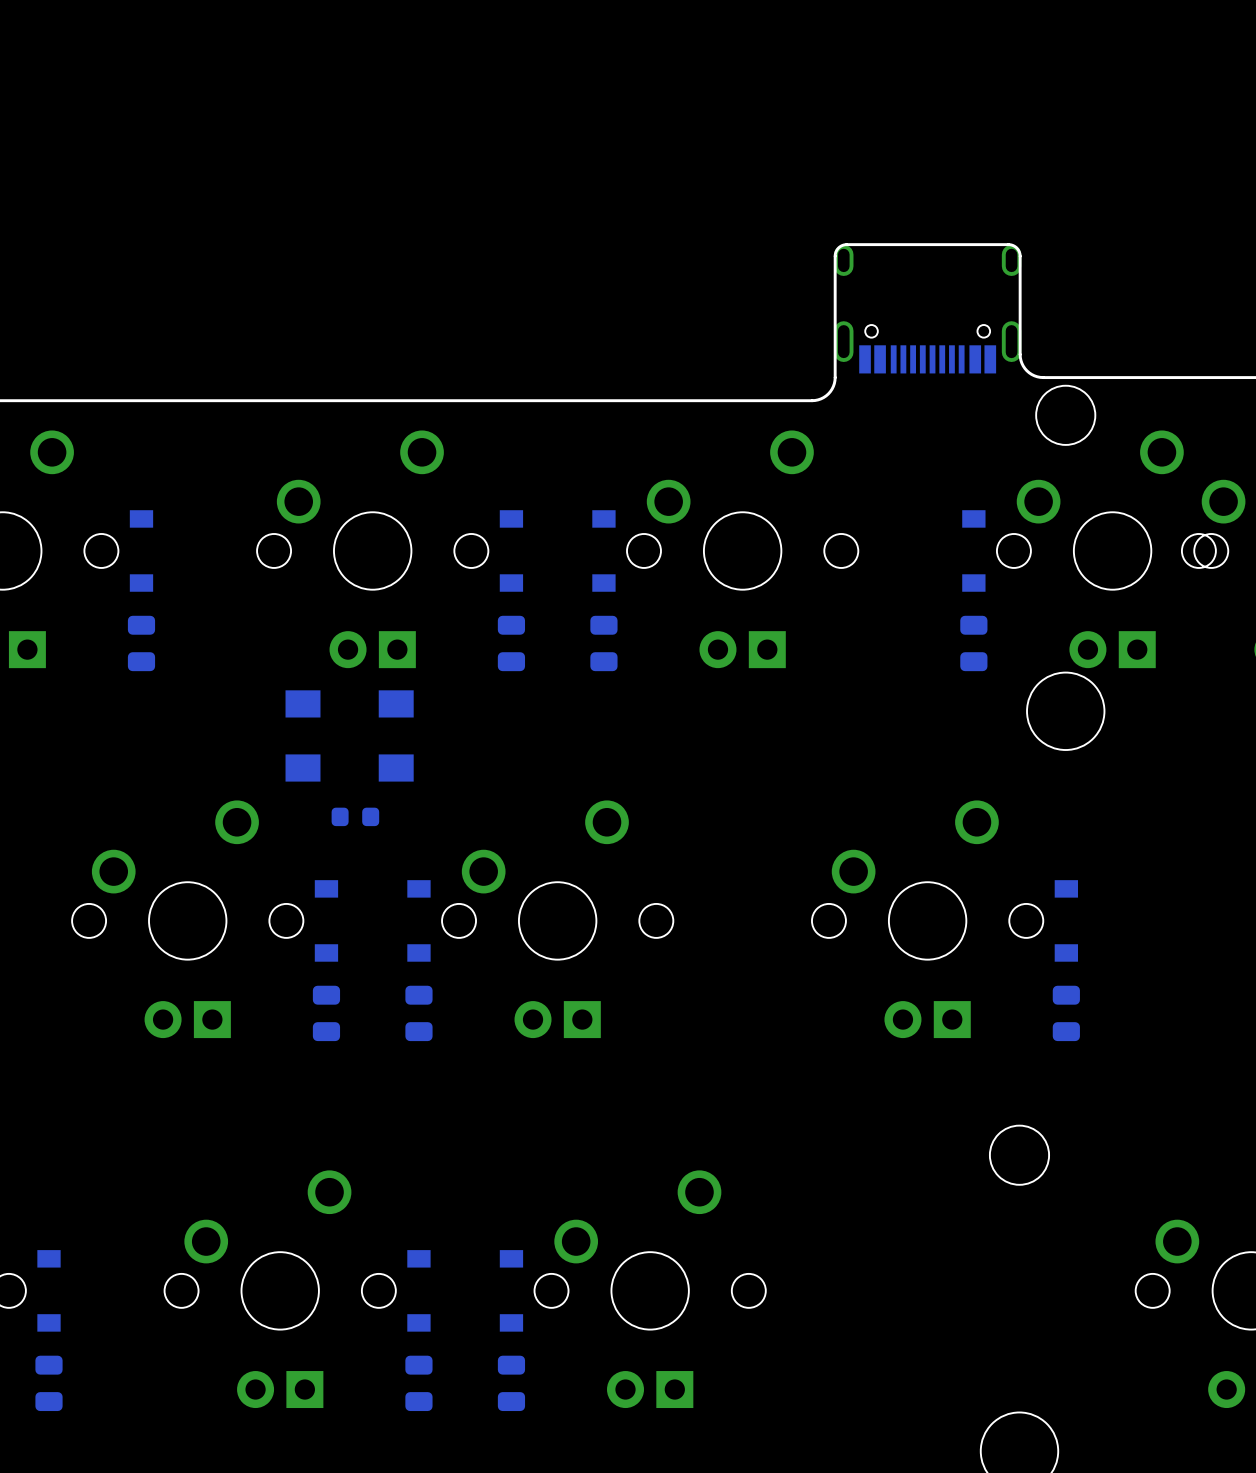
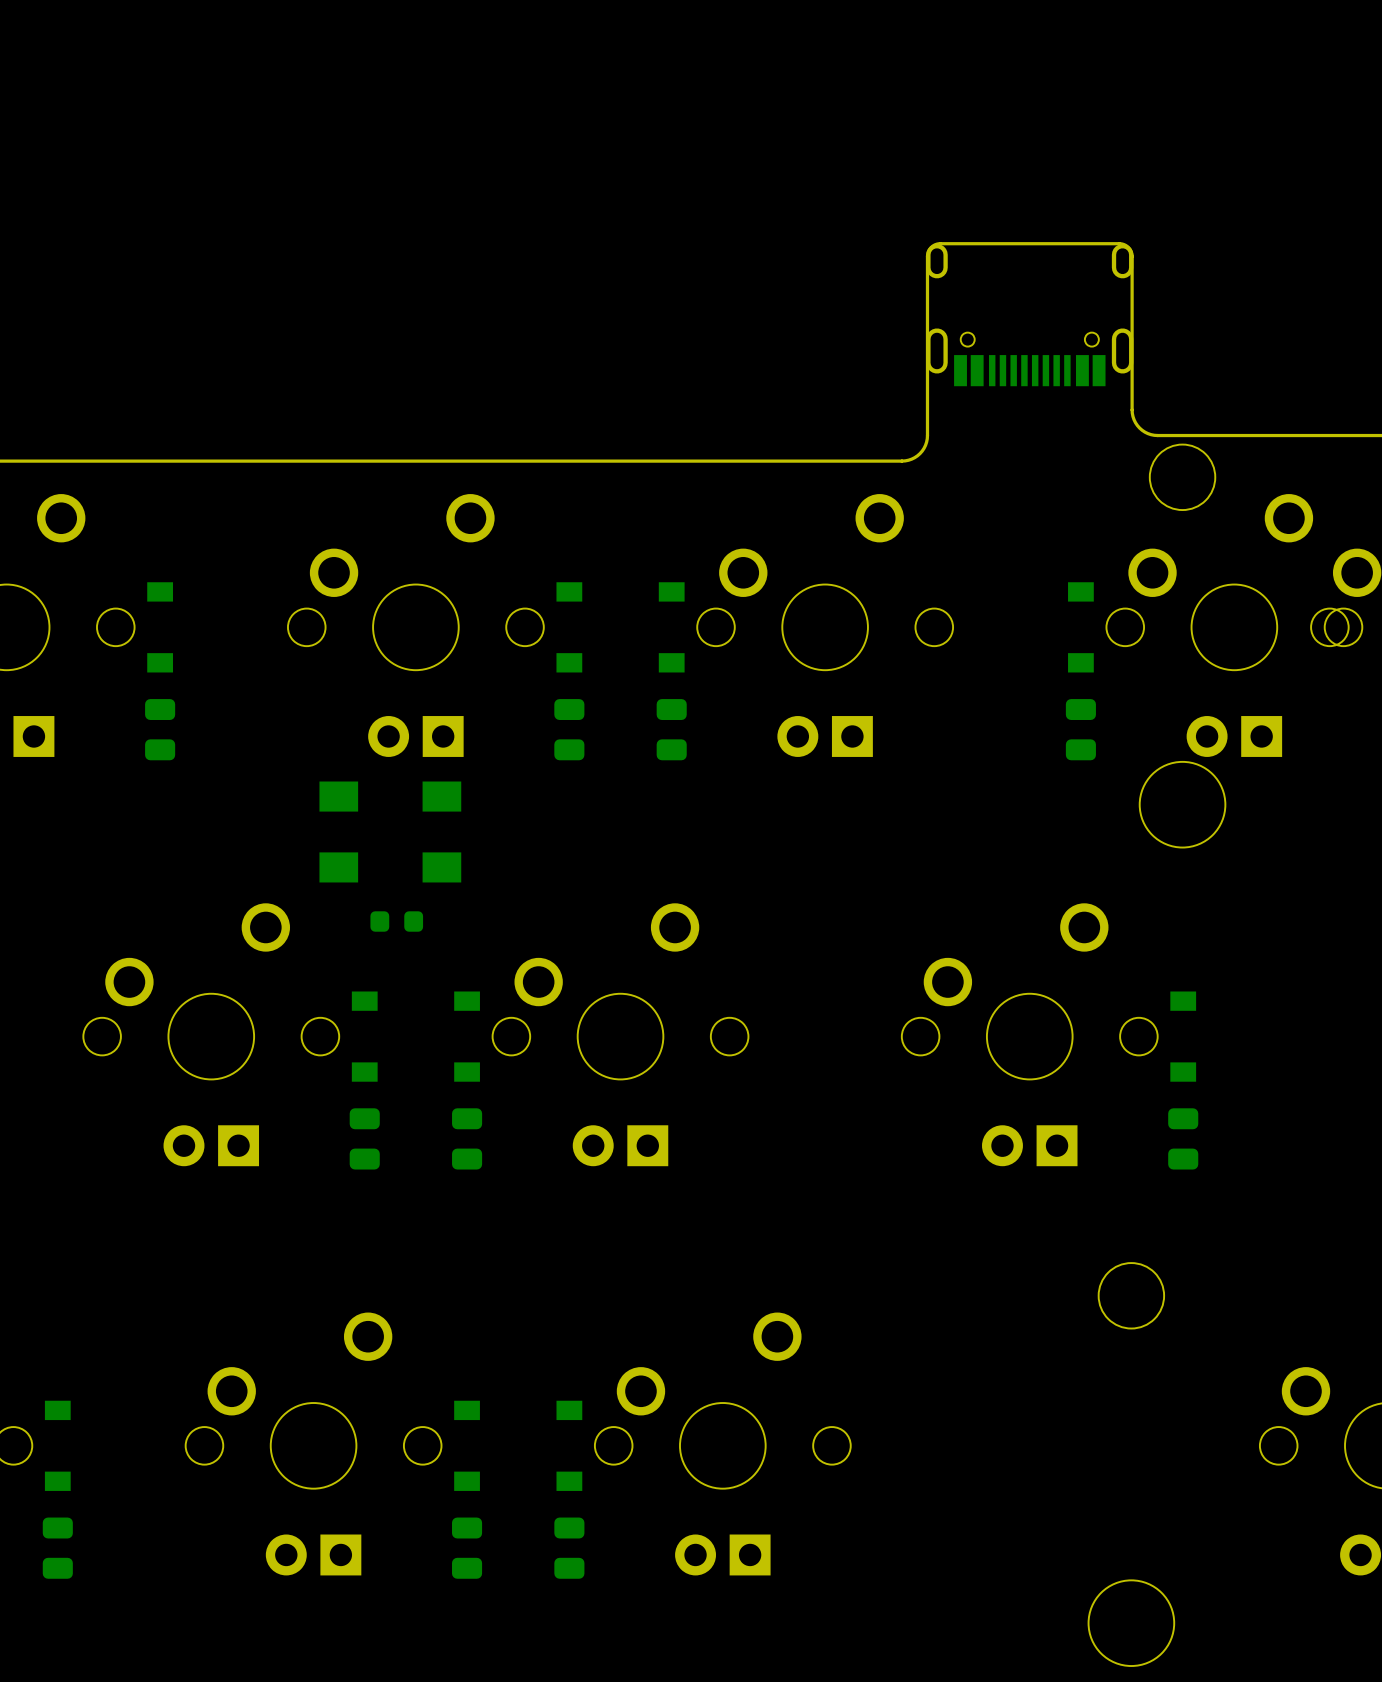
board edge: (835, 256) (838, 248) (846, 244) (1010, 244) (1017, 249) (1020, 256) -> (927, 301) (927, 253) (932, 246) (940, 243) (1122, 244) (1129, 248) (1132, 254) (1132, 301)
part position: (927, 309) -> (1029, 315)

